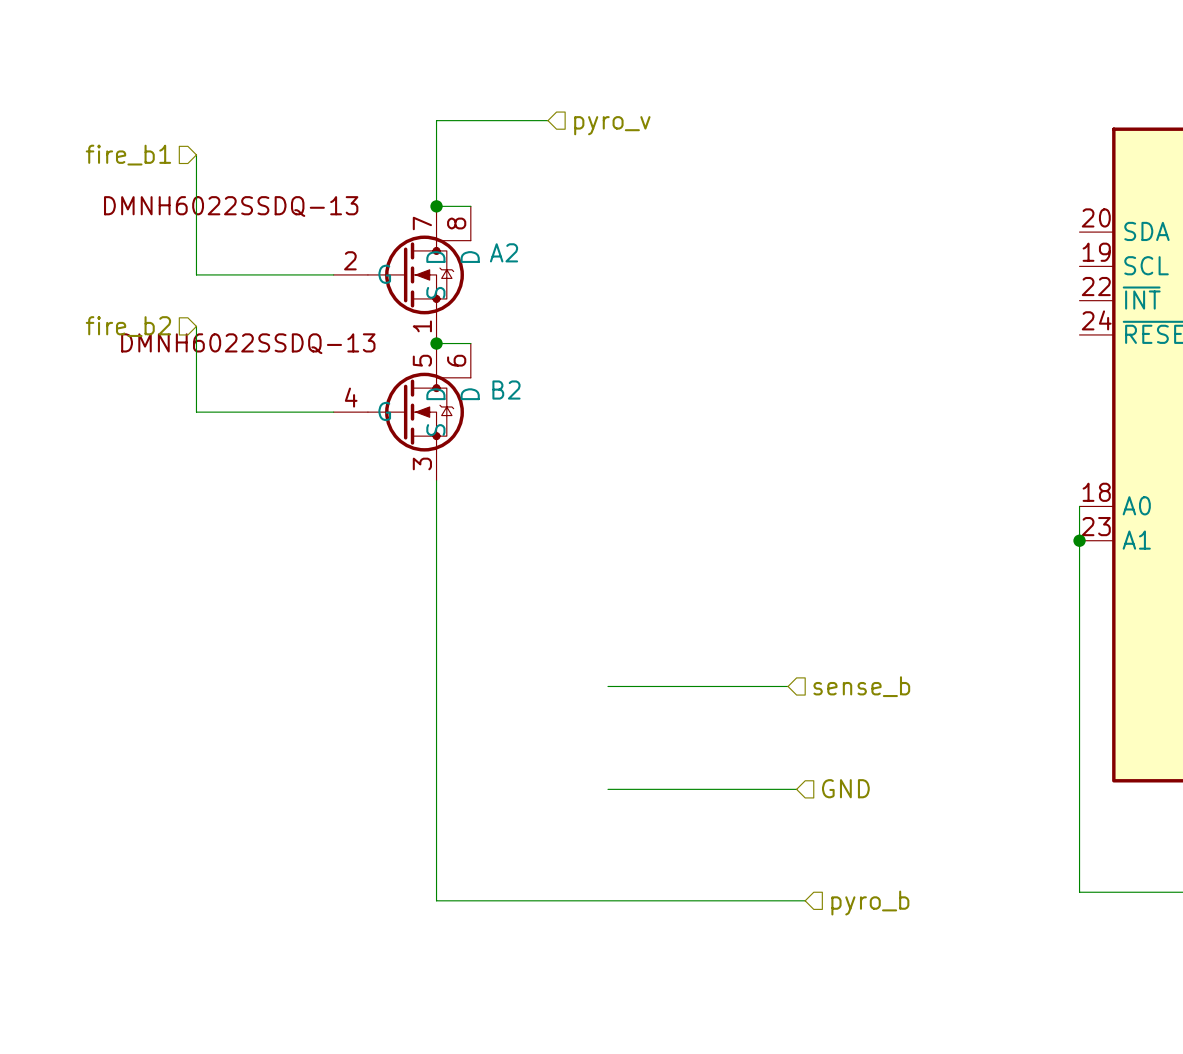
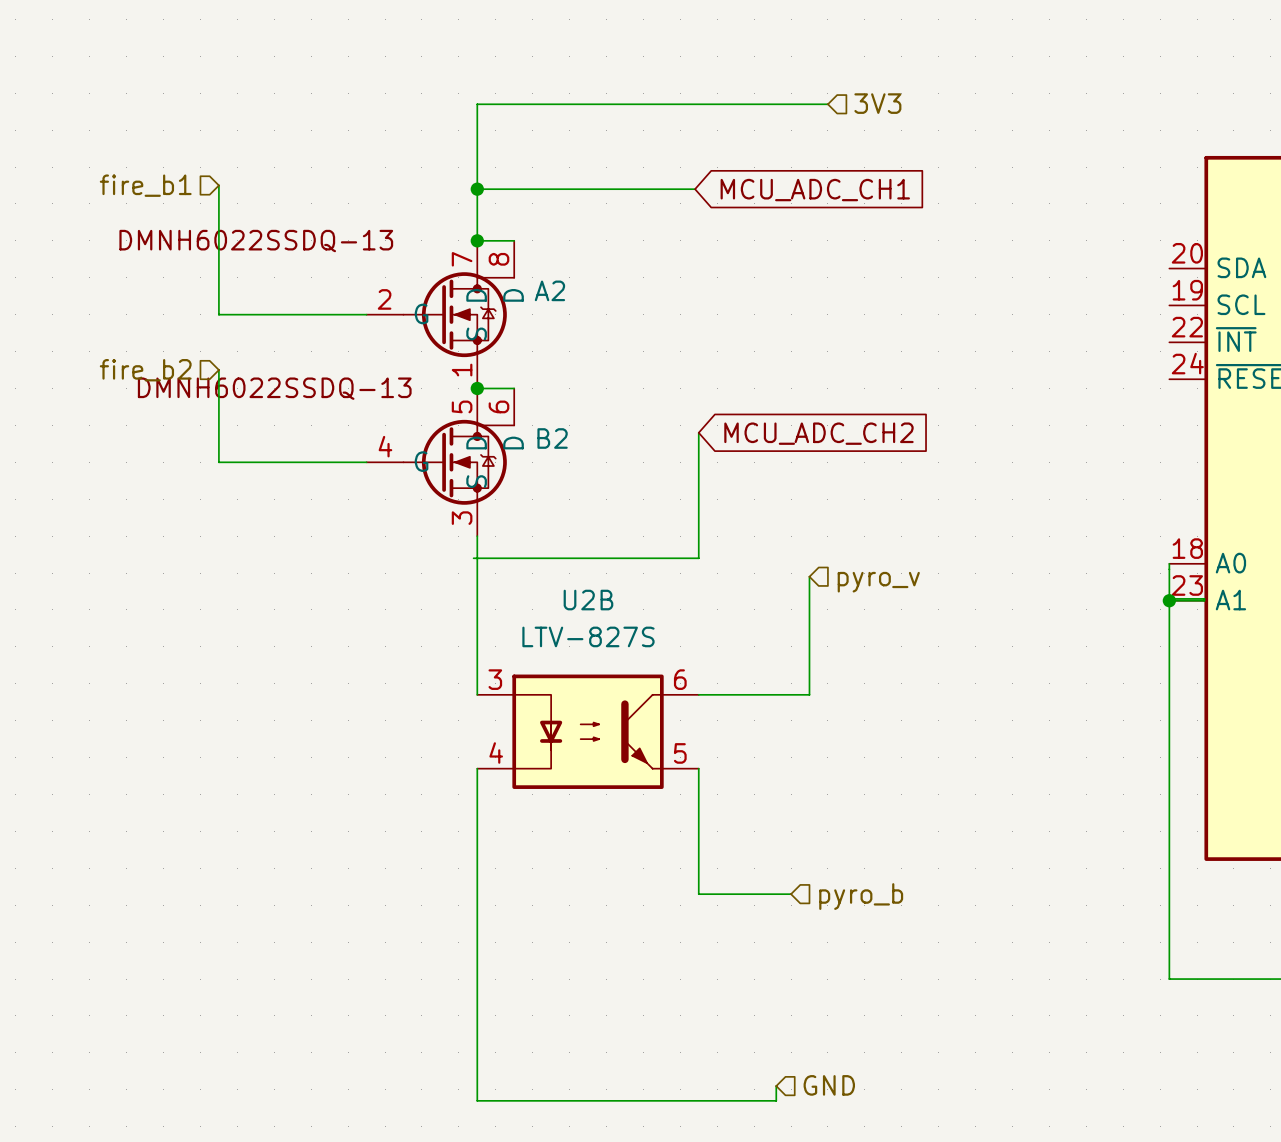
hierarchical label: none -> 3V3 (877, 103)
wire: (436, 120) (547, 120) -> (477, 148) (477, 104) (827, 104)
hierarchical label: pyro_v (612, 125) -> none
wire: none -> (477, 189) (695, 189)
junction: none -> (477, 189)
global label: none -> MCU_ADC_CH1 (815, 190)
wire: none -> (698, 432) (698, 558) (473, 558)
global label: none -> MCU_ADC_CH2 (818, 433)
wire: none -> (809, 576) (809, 694) (698, 694)
hierarchical label: none -> pyro_v (878, 582)
wire: none -> (1167, 598) (1204, 598) (1204, 600) (1169, 600)
wire: (436, 628) (436, 696) -> none
U2B: none -> LTV-827S (588, 731)
wire: (607, 686) (788, 686) -> none
hierarchical label: sense_b (861, 686) -> none
wire: none -> (698, 768) (698, 894) (791, 894)
hierarchical label position: GND (845, 788) -> GND (829, 1085)
wire: (607, 789) (796, 789) -> none
wire: (436, 900) (805, 900) -> (477, 988) (477, 1100) (776, 1100) (776, 1086)
hierarchical label position: pyro_b (870, 903) -> pyro_b (861, 896)

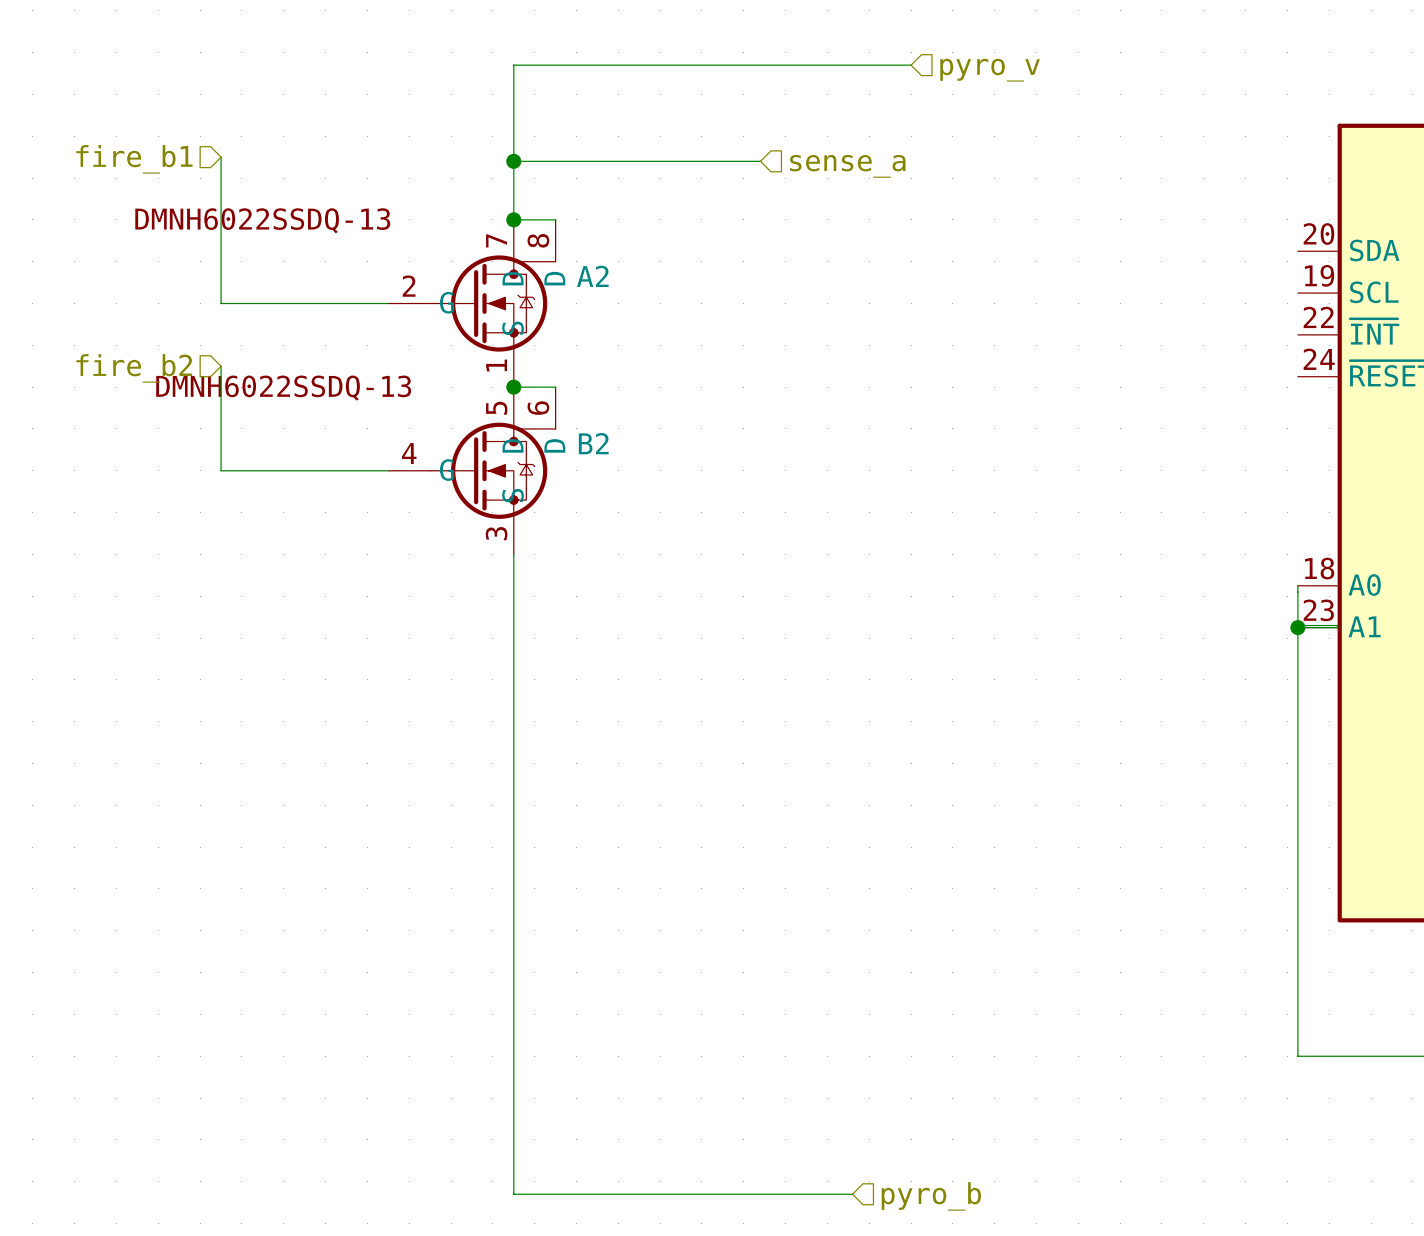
hierarchical label: 3V3 (877, 103) -> pyro_v (990, 70)
global label: MCU_ADC_CH1 (815, 190) -> none
hierarchical label: none -> sense_a (847, 166)
wire: (698, 432) (698, 558) (473, 558) -> none
global label: MCU_ADC_CH2 (818, 433) -> none
wire: (809, 576) (809, 694) (698, 694) -> none
hierarchical label: pyro_v (878, 582) -> none
wire: none -> (513, 734) (513, 817)
U2B: LTV-827S (588, 731) -> none
wire: (698, 768) (698, 894) (791, 894) -> none
hierarchical label position: pyro_b (861, 896) -> pyro_b (931, 1196)
hierarchical label: GND (829, 1085) -> none
wire: (776, 1086) (776, 1100) -> none

